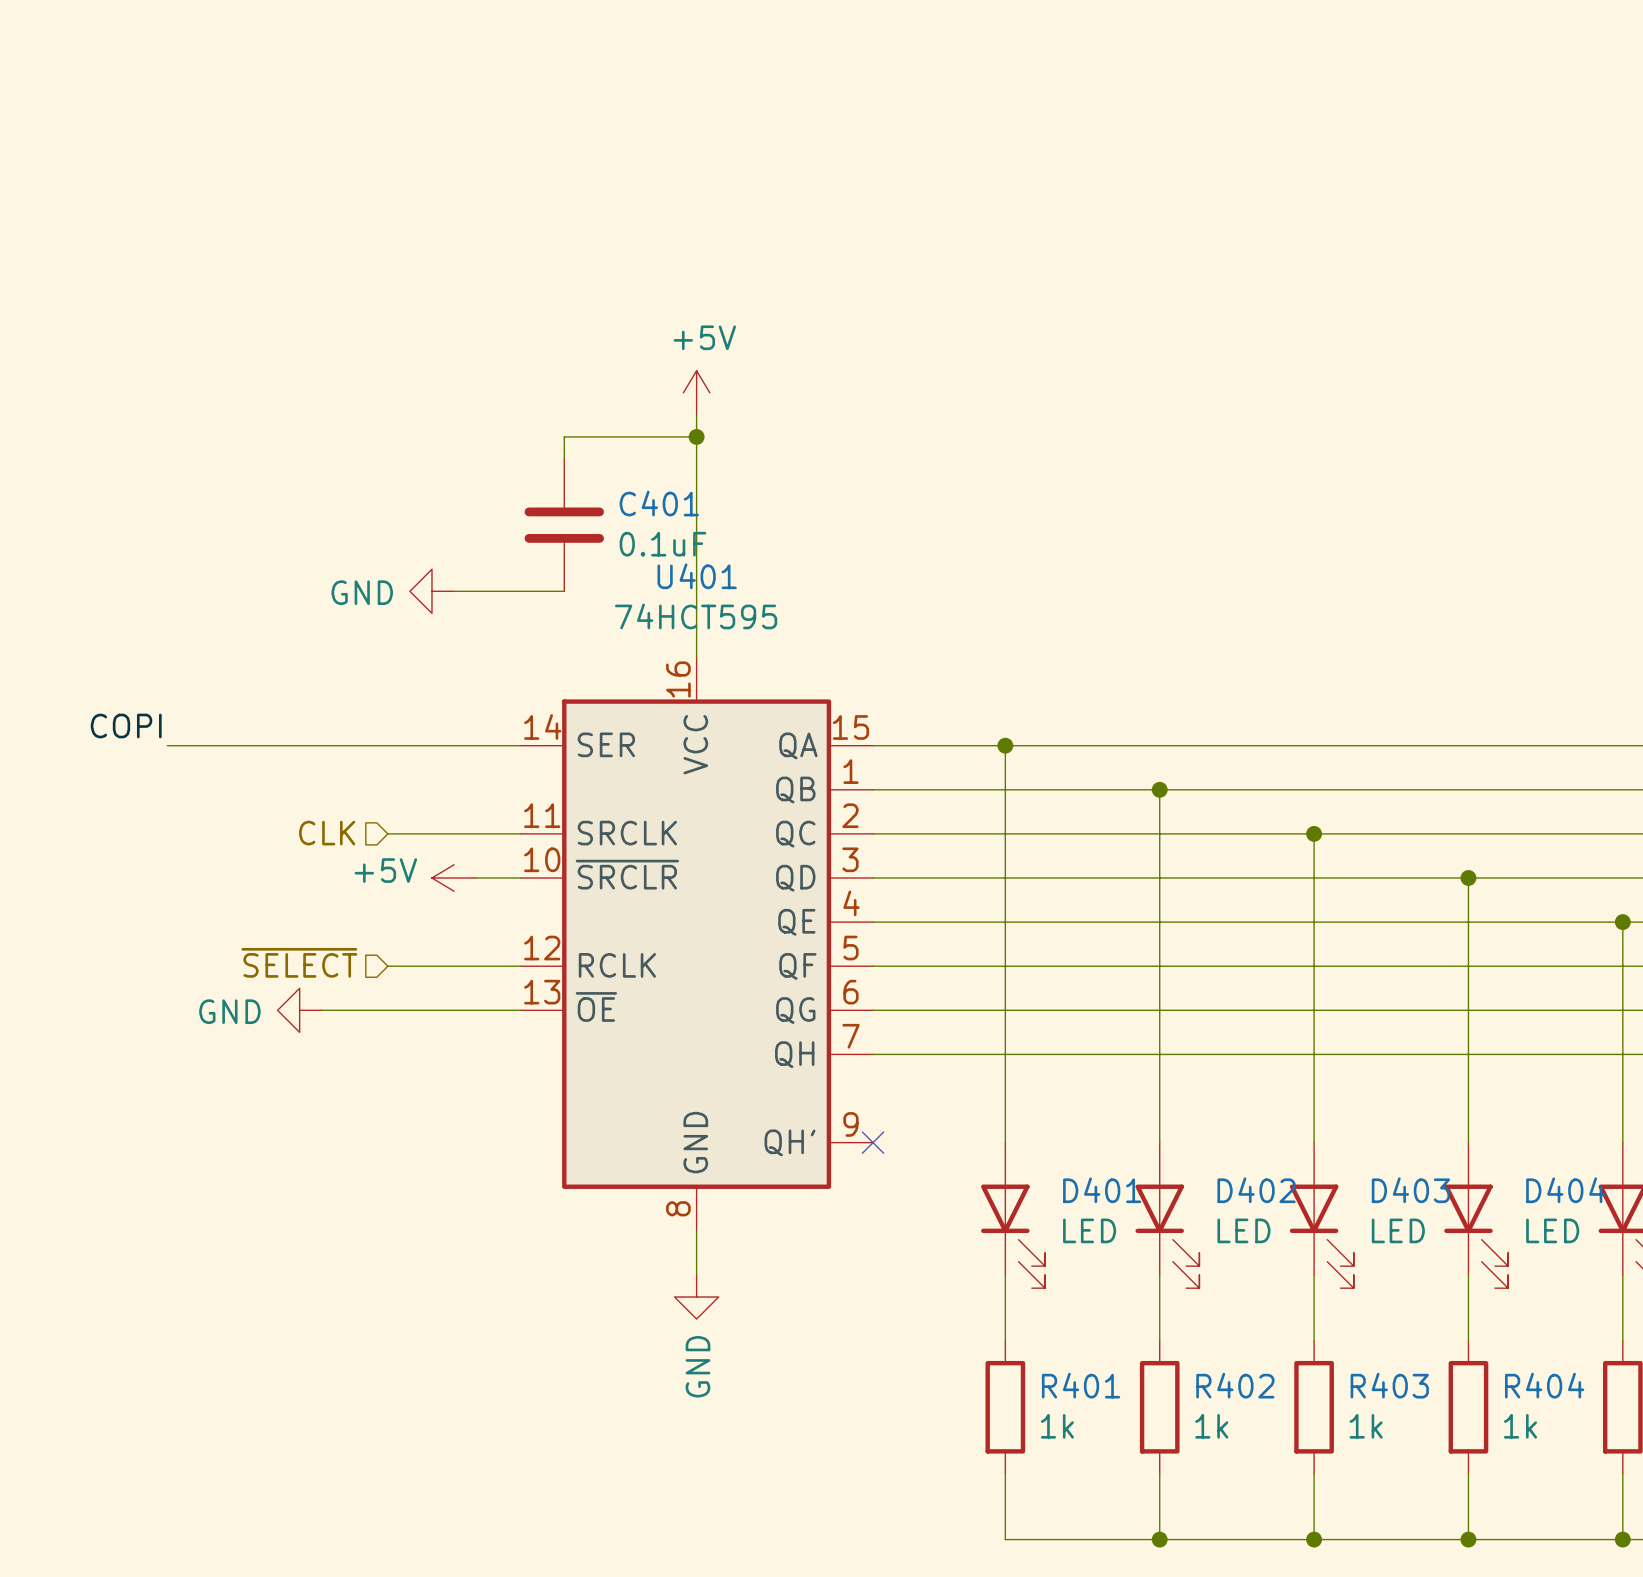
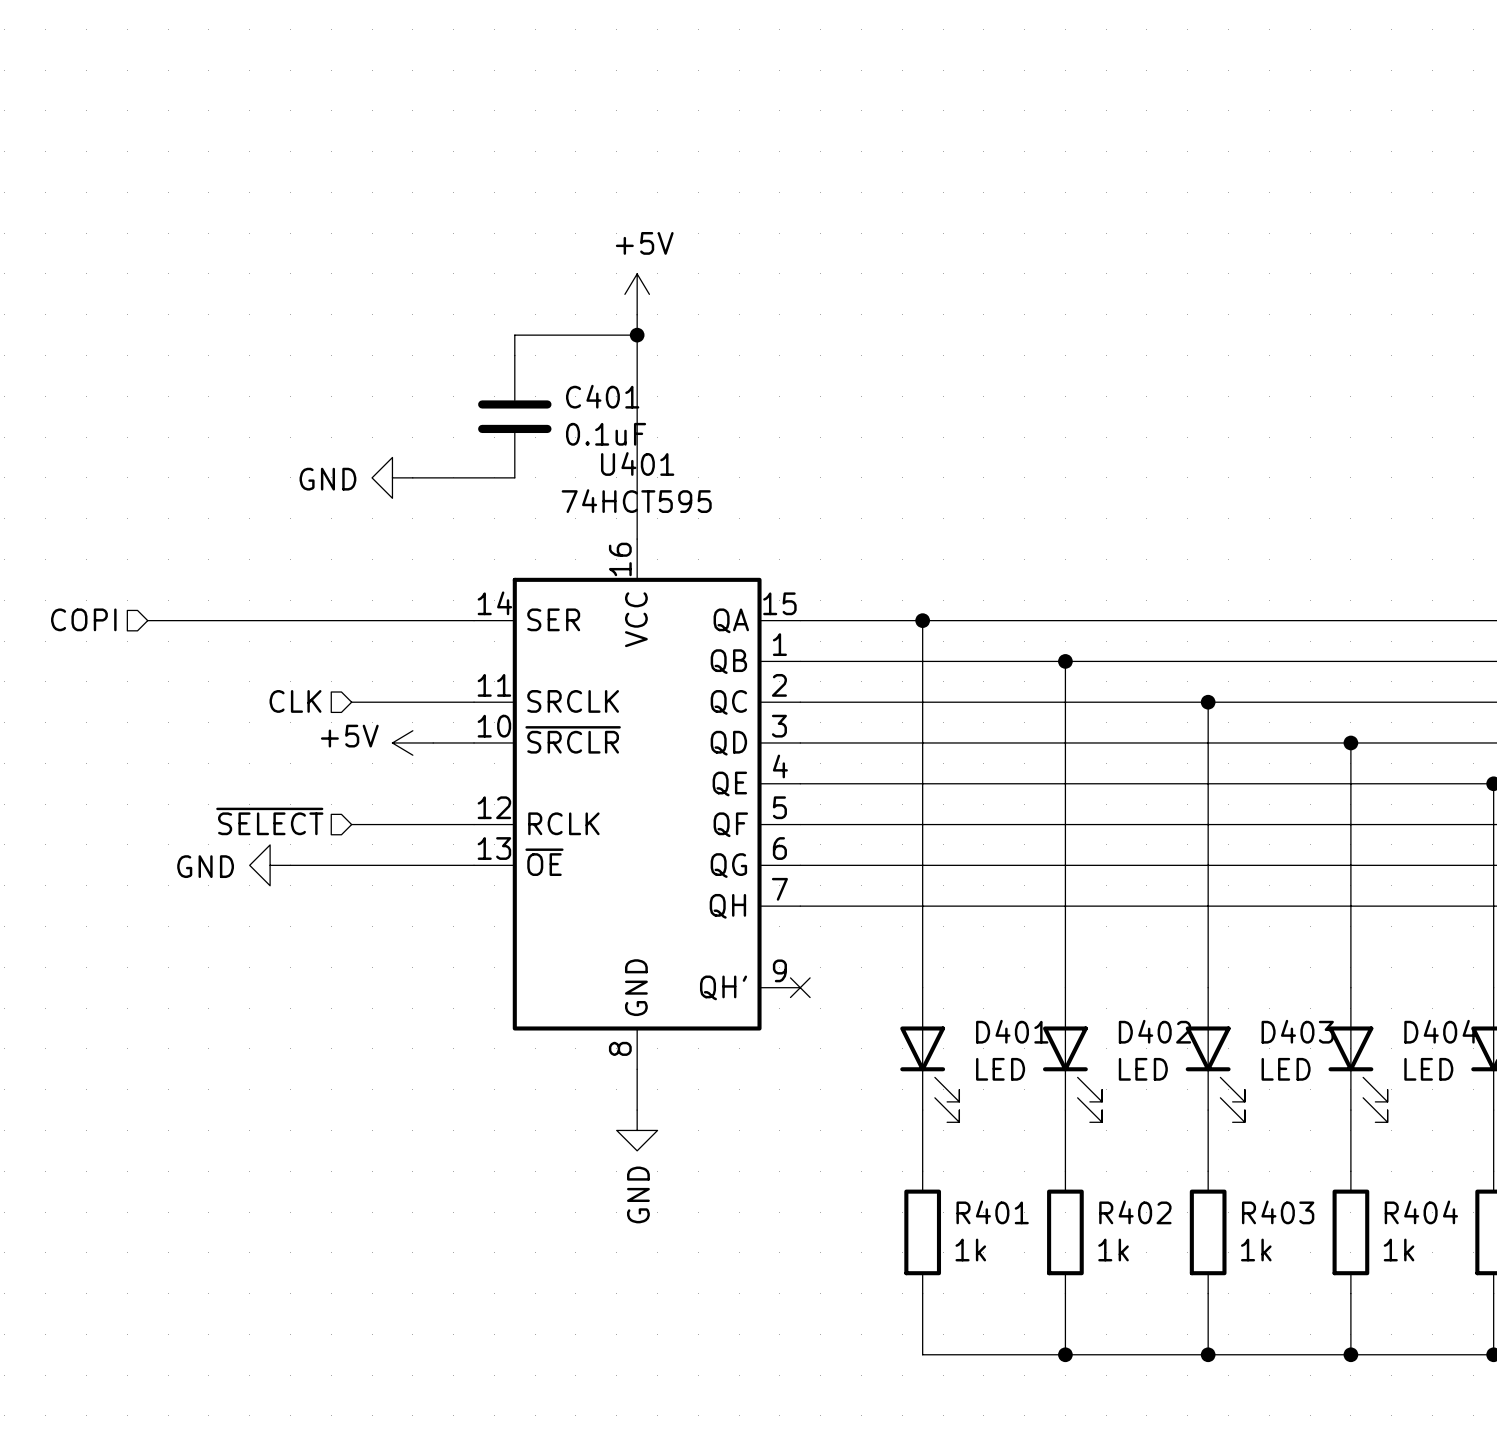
label: COPI (126, 726) -> none
hierarchical label: none -> COPI (83, 619)

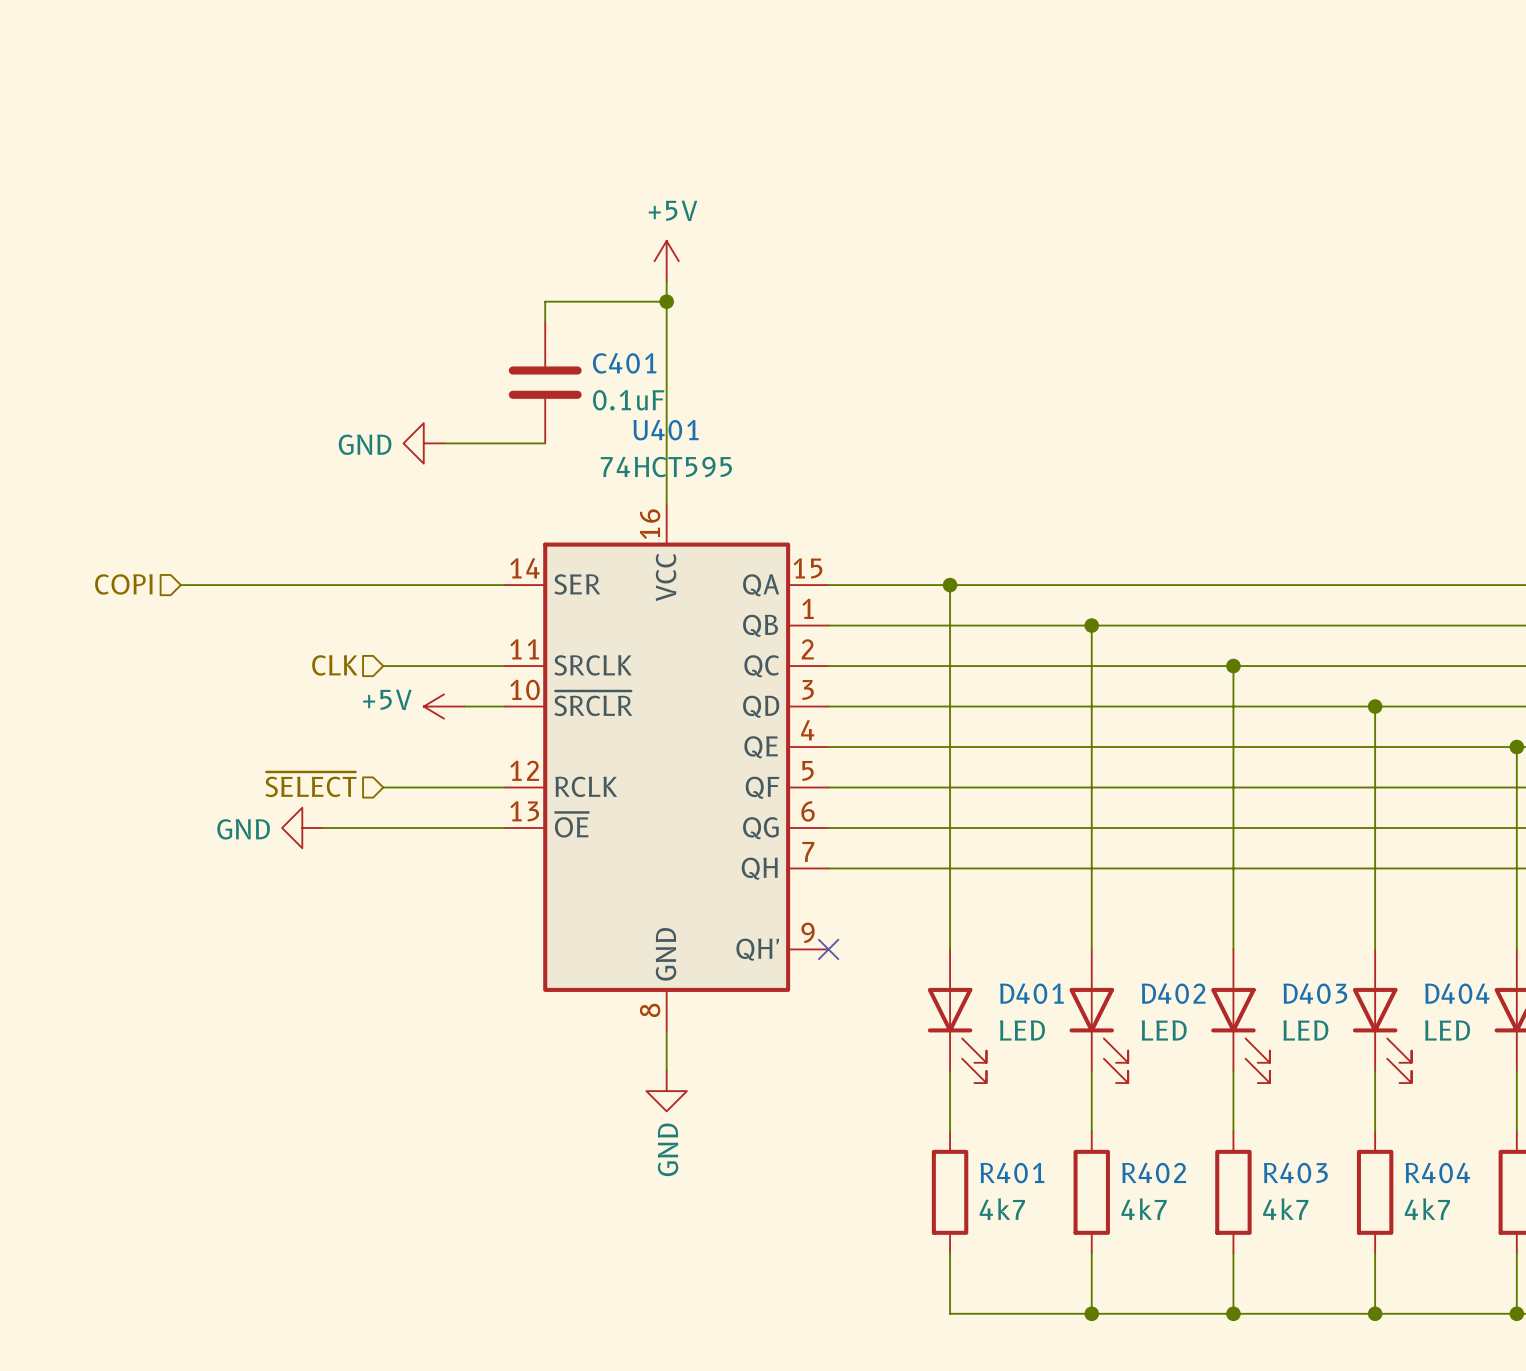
R401 value: 1k (970, 1250) -> 4k7 (1002, 1209)
R402 value: 1k (1113, 1250) -> 4k7 (1144, 1209)
R403 value: 1k (1256, 1250) -> 4k7 (1285, 1209)
R404 value: 1k (1399, 1250) -> 4k7 (1427, 1209)

